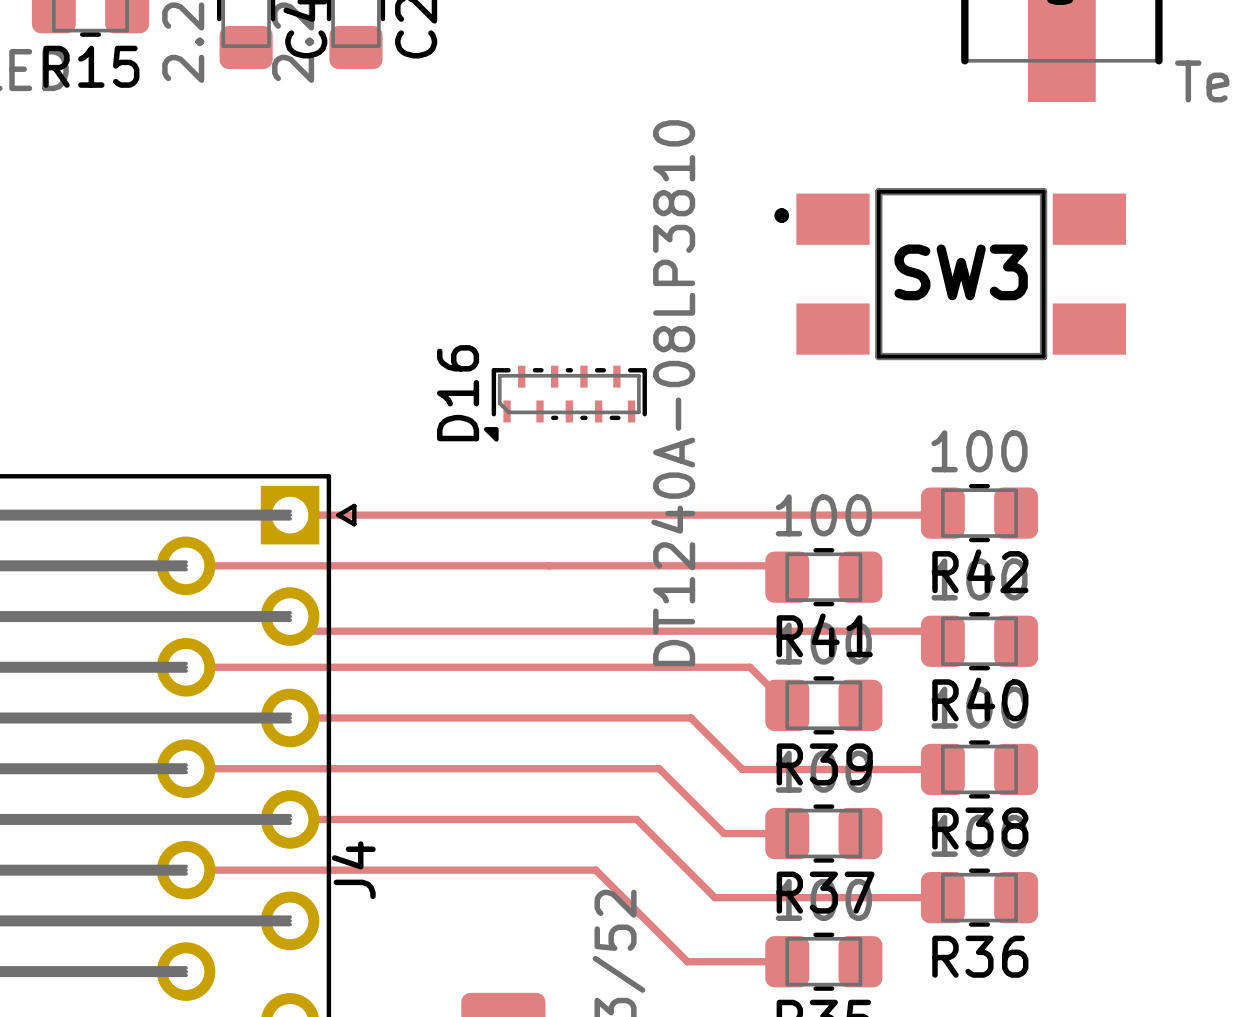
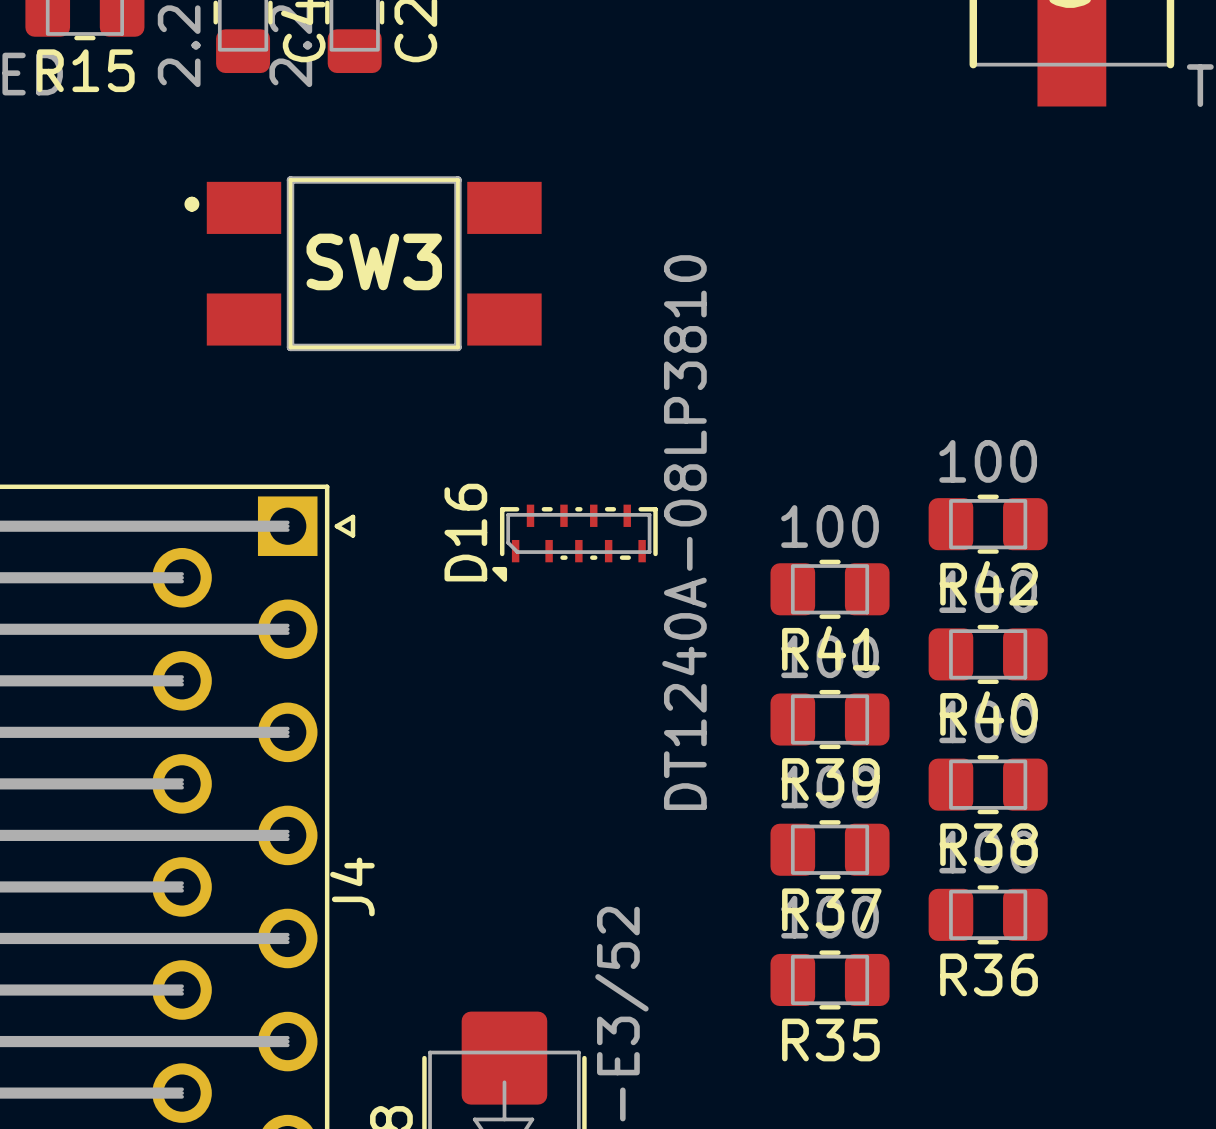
SW3 position: (950, 274) -> (363, 263)
D16 position: (565, 403) -> (574, 543)
track: (942, 513) (940, 515) (290, 515) -> none
track: (186, 565) (775, 565) (787, 577) -> none
track: (290, 616) (304, 631) (932, 631) (942, 641) -> none
track: (186, 667) (750, 667) (787, 705) -> none
track: (290, 718) (690, 718) (742, 769) (941, 768) -> none
track: (186, 768) (659, 768) (724, 833) (787, 833) -> none
track: (290, 819) (636, 819) (714, 897) (942, 897) -> none
track: (186, 870) (595, 870) (687, 961) (787, 961) -> none

